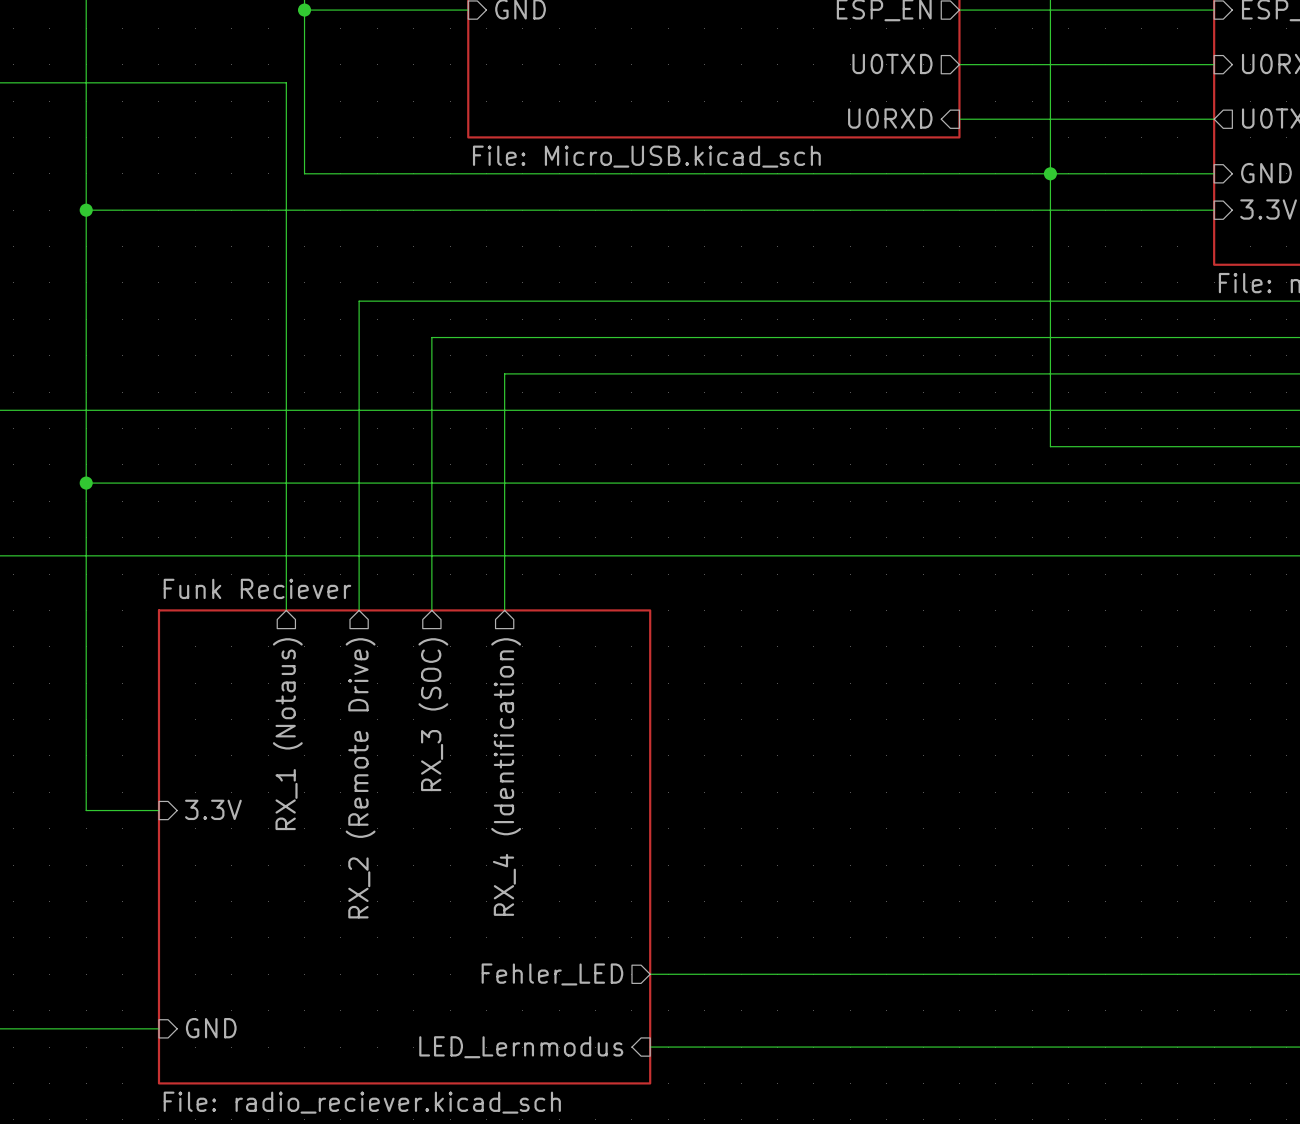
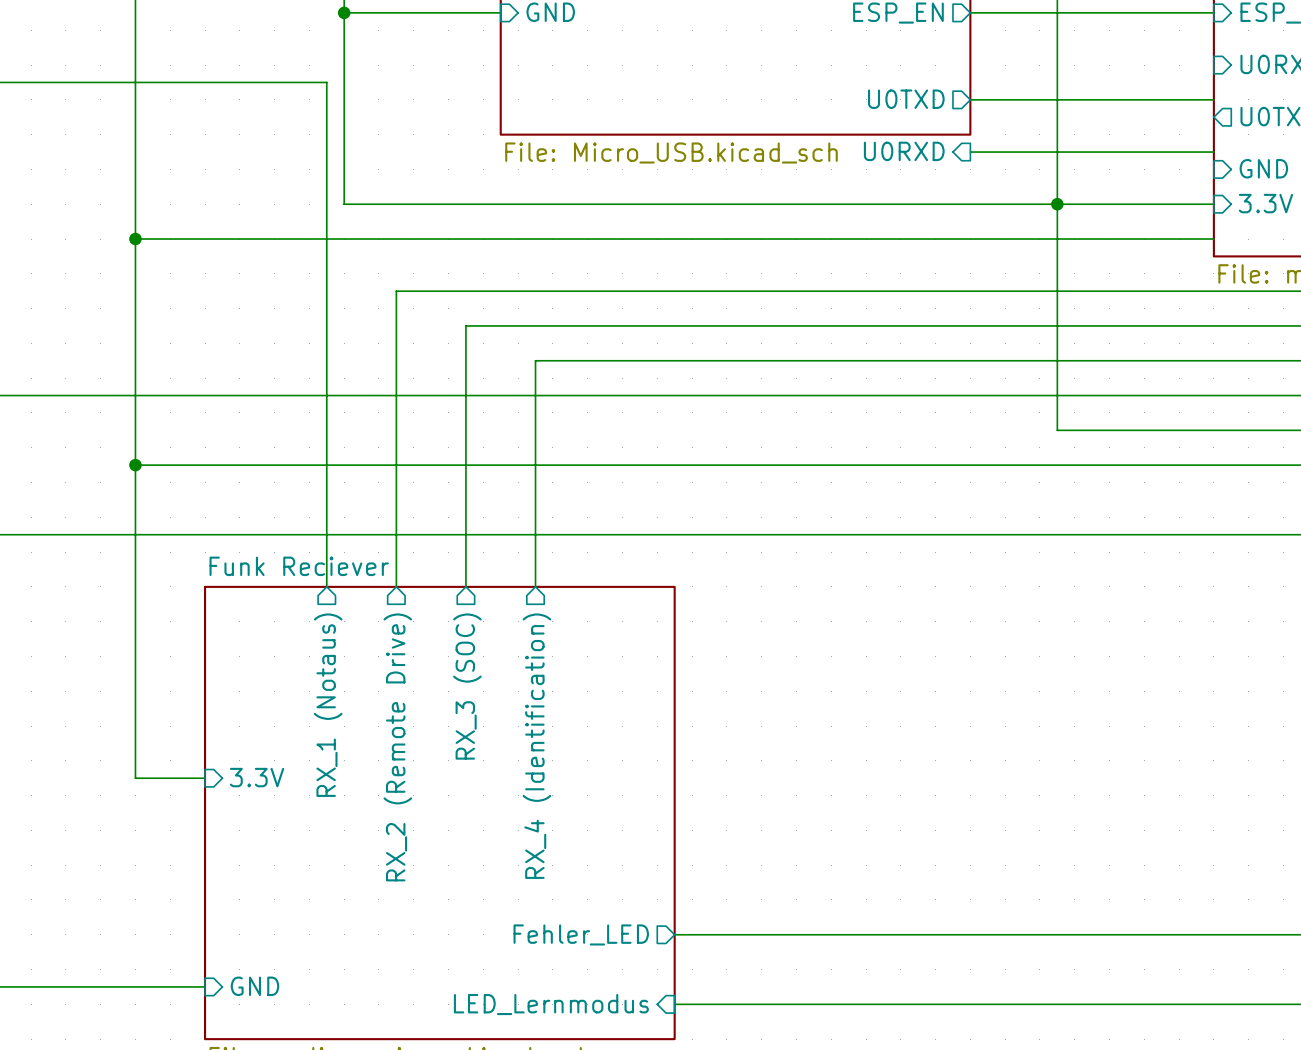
sheet pin position: U0TXD (892, 63) -> U0TXD (906, 99)
wire: (959, 64) (1214, 64) -> (970, 99) (1213, 99)
sheet pin position: U0RXD (890, 118) -> U0RXD (904, 151)
wire: (959, 119) (1214, 119) -> (970, 152) (1213, 152)
wire: (304, 173) (1214, 173) -> none
junction position: (1050, 173) -> (1057, 204)
wire: (86, 210) (304, 210) -> (344, 169) (344, 204)
junction position: (86, 210) -> (135, 239)
wire: none -> (135, 239) (1213, 239)

